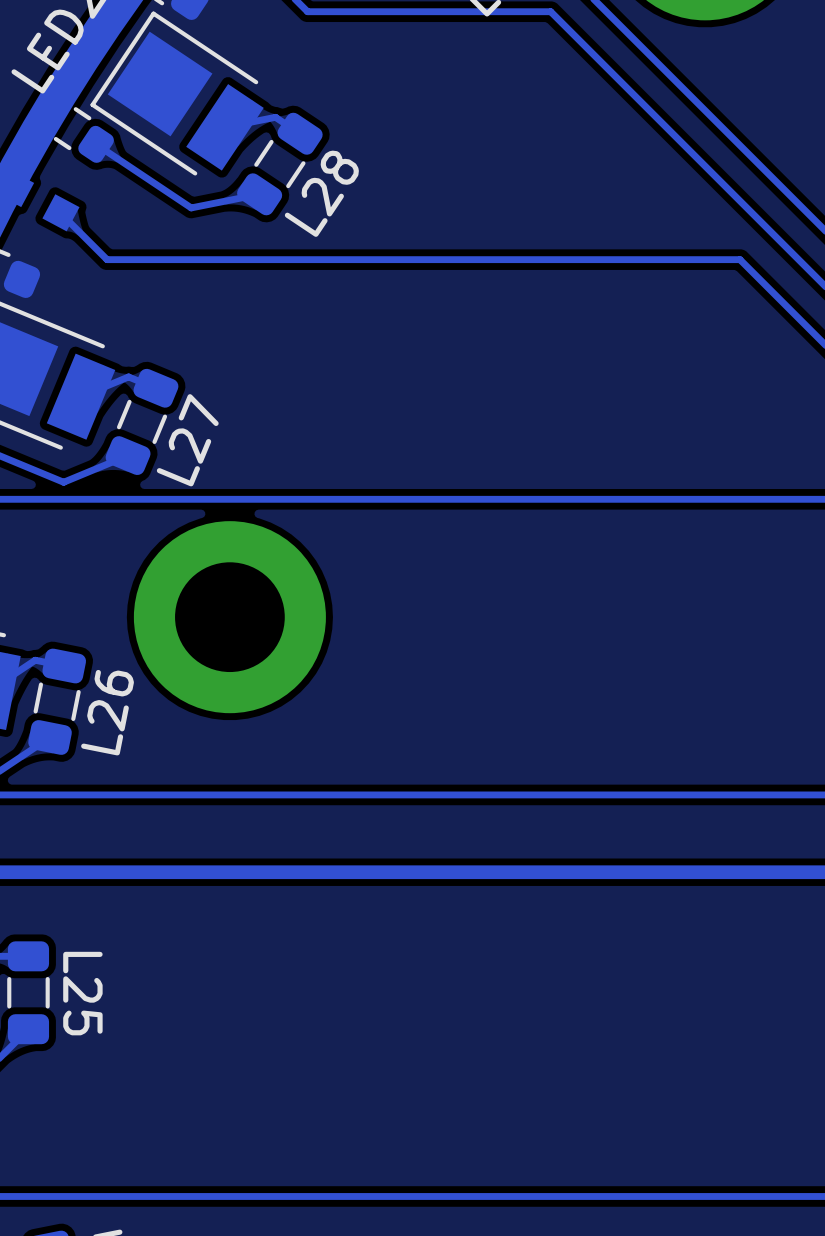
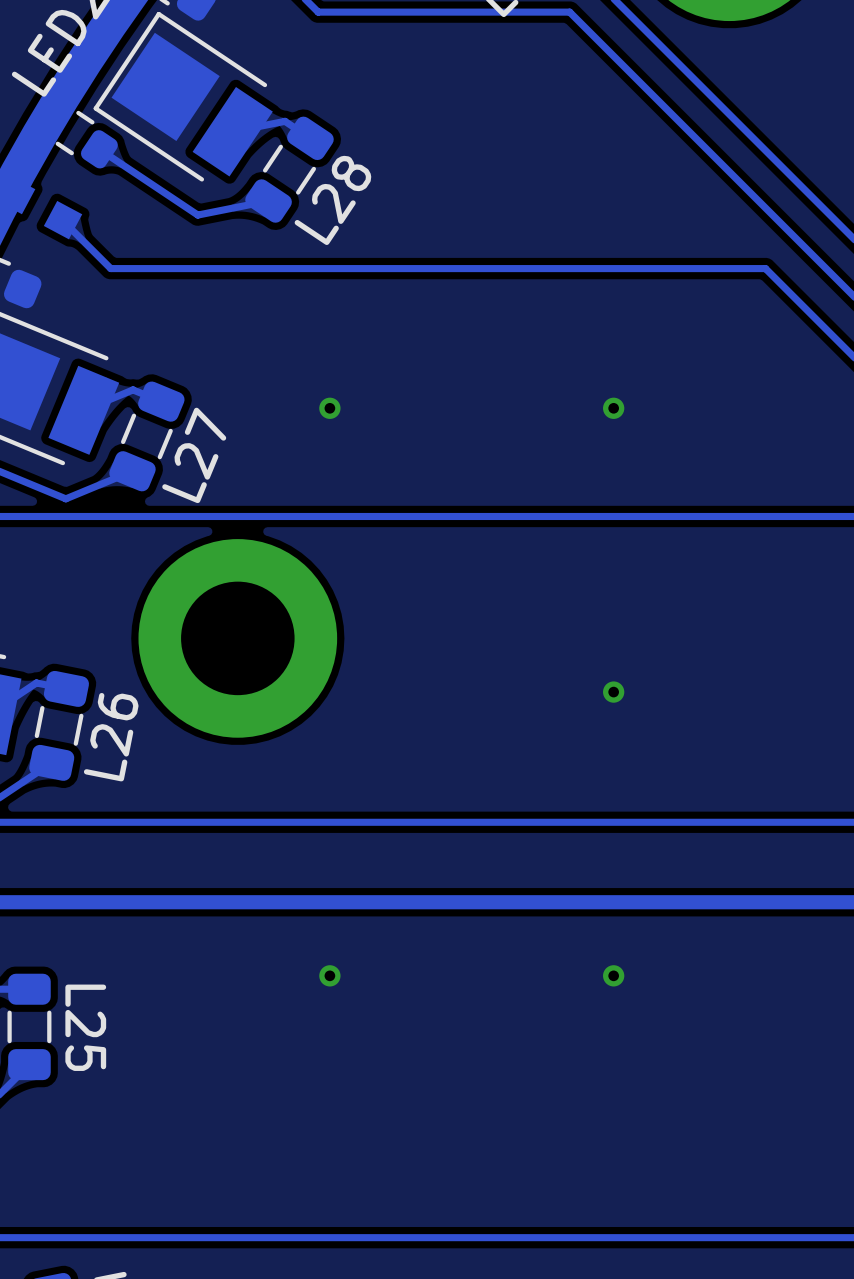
via: none -> (329, 408)
via: none -> (613, 408)
via: none -> (613, 692)
via: none -> (329, 975)
via: none -> (613, 975)

